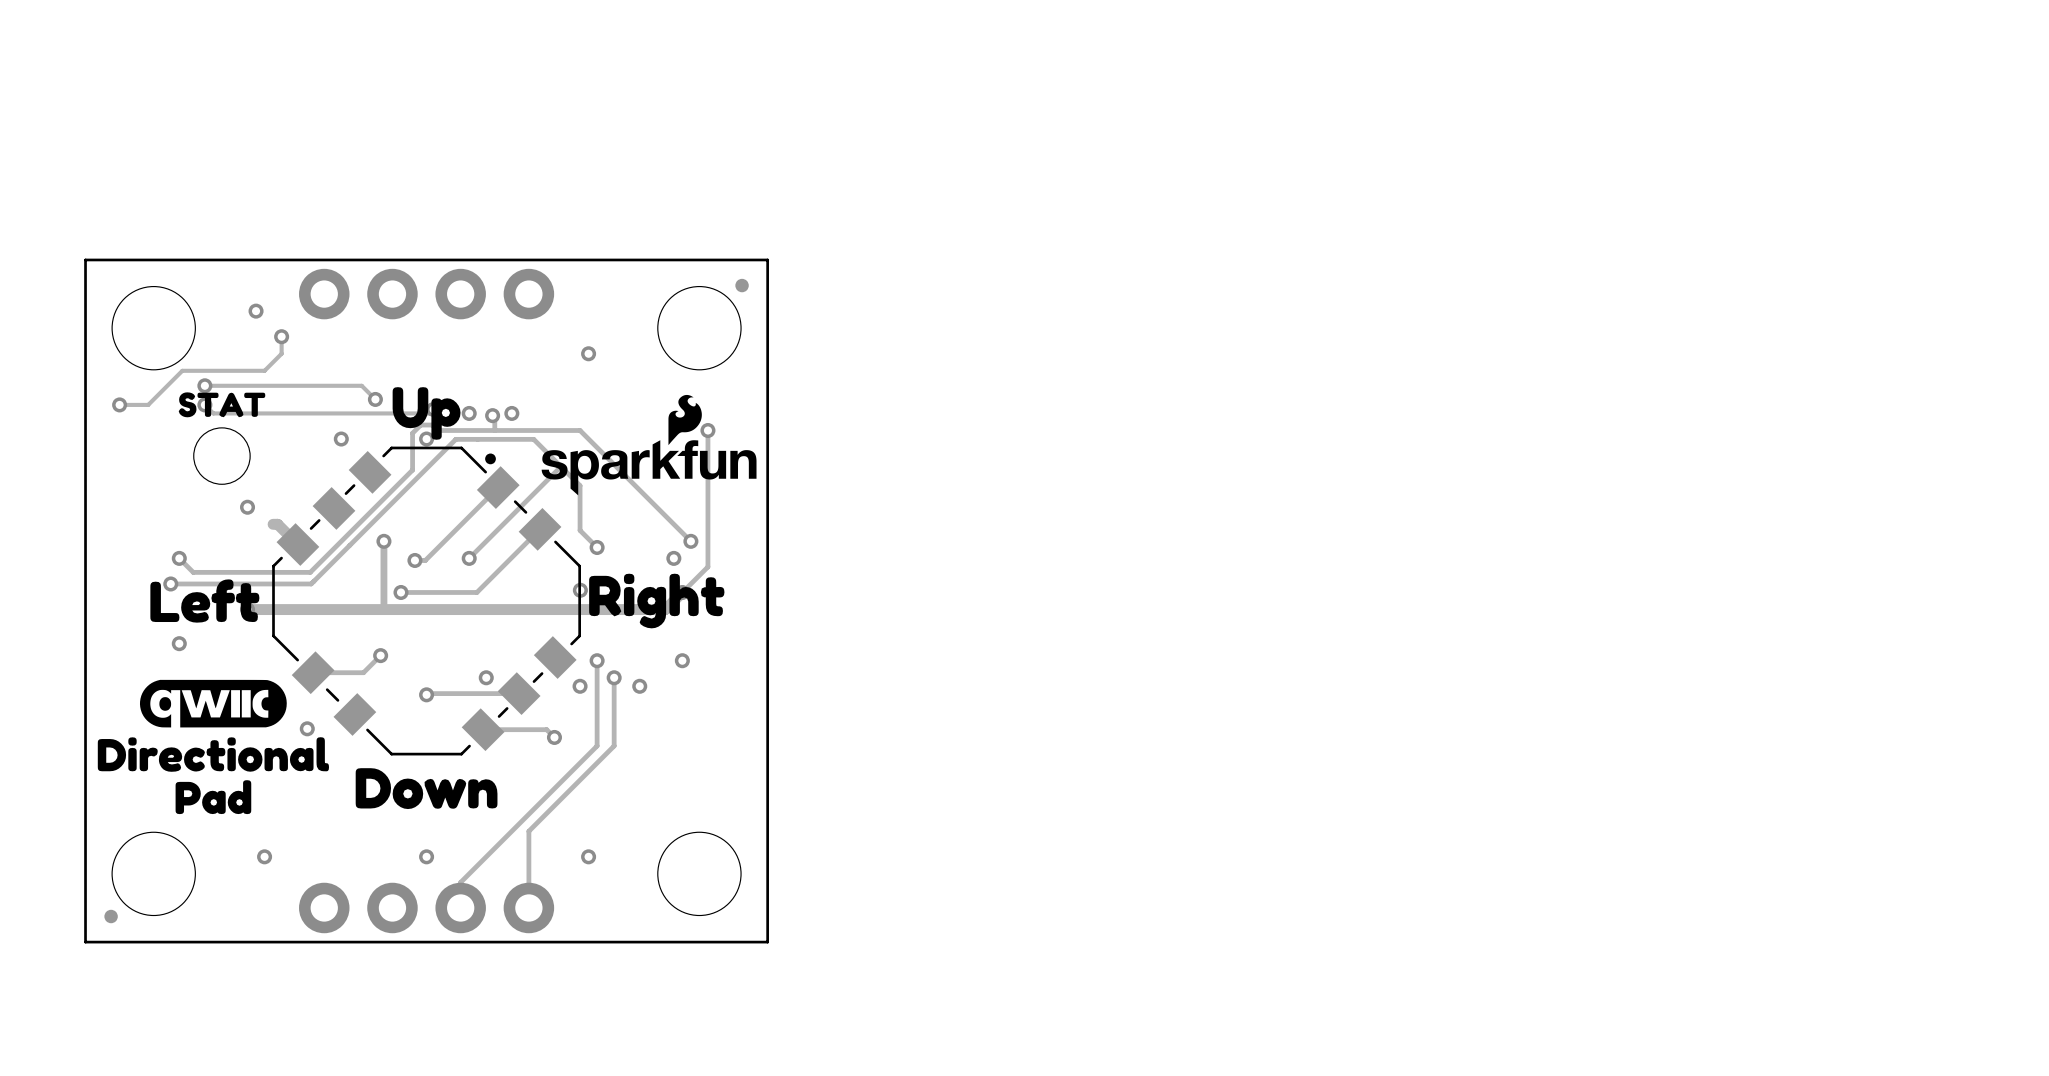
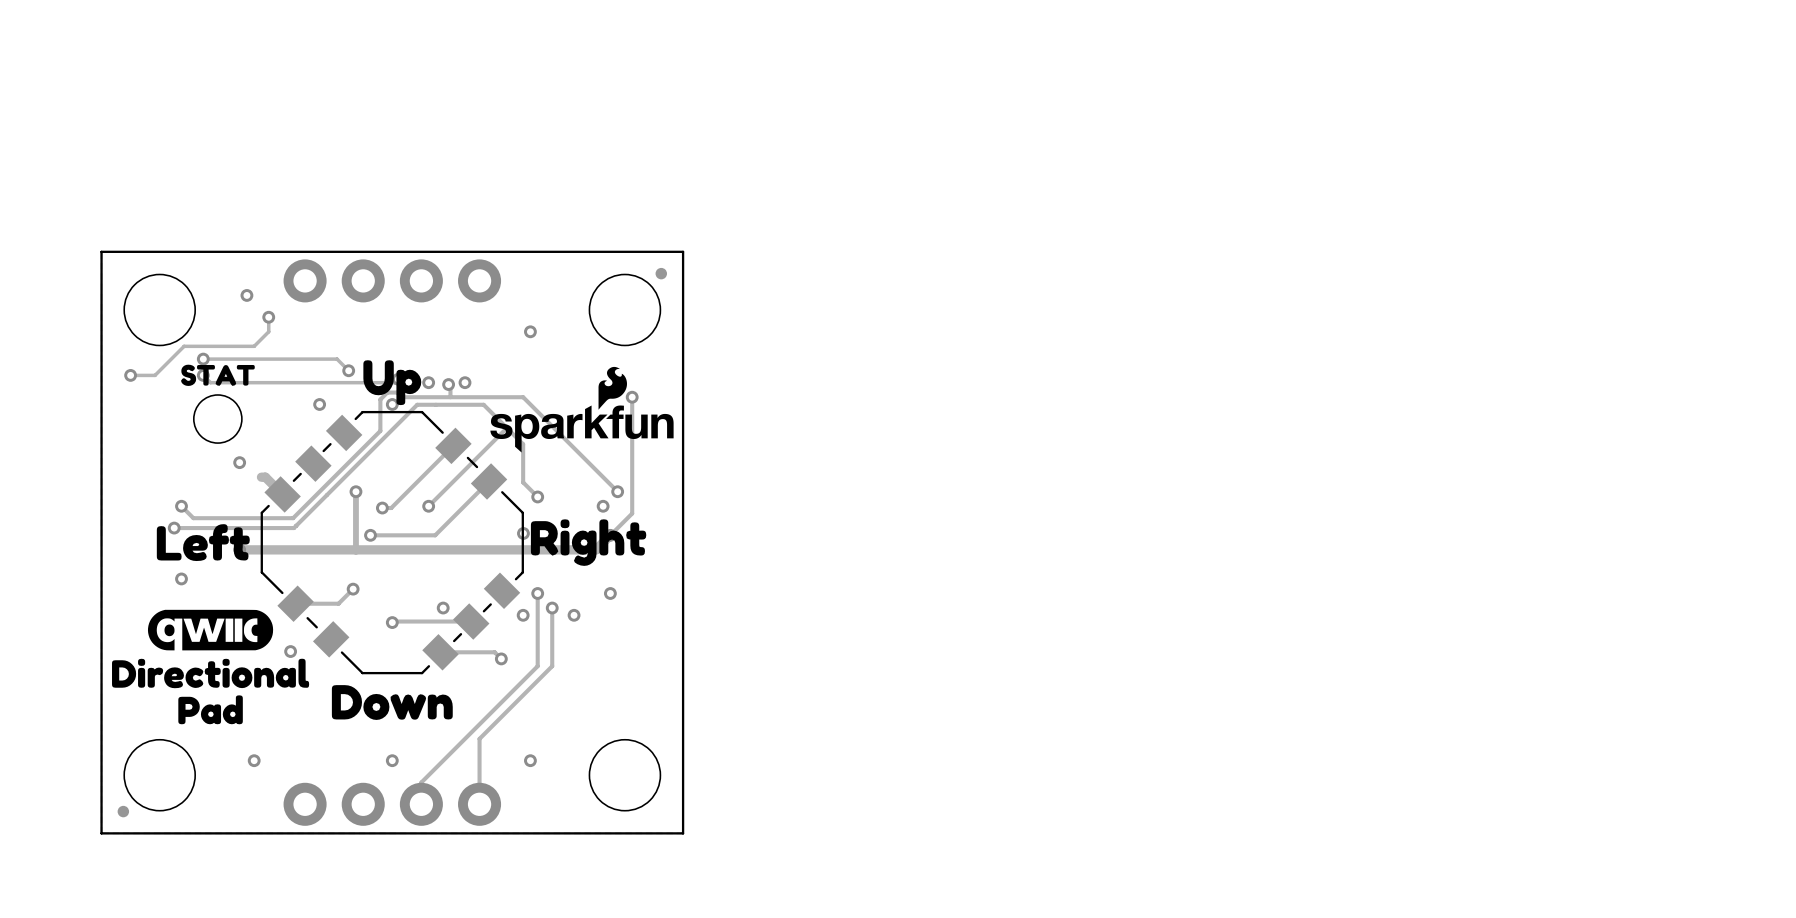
part footprint: [272, 446, 581, 756] -> [260, 410, 524, 675]

